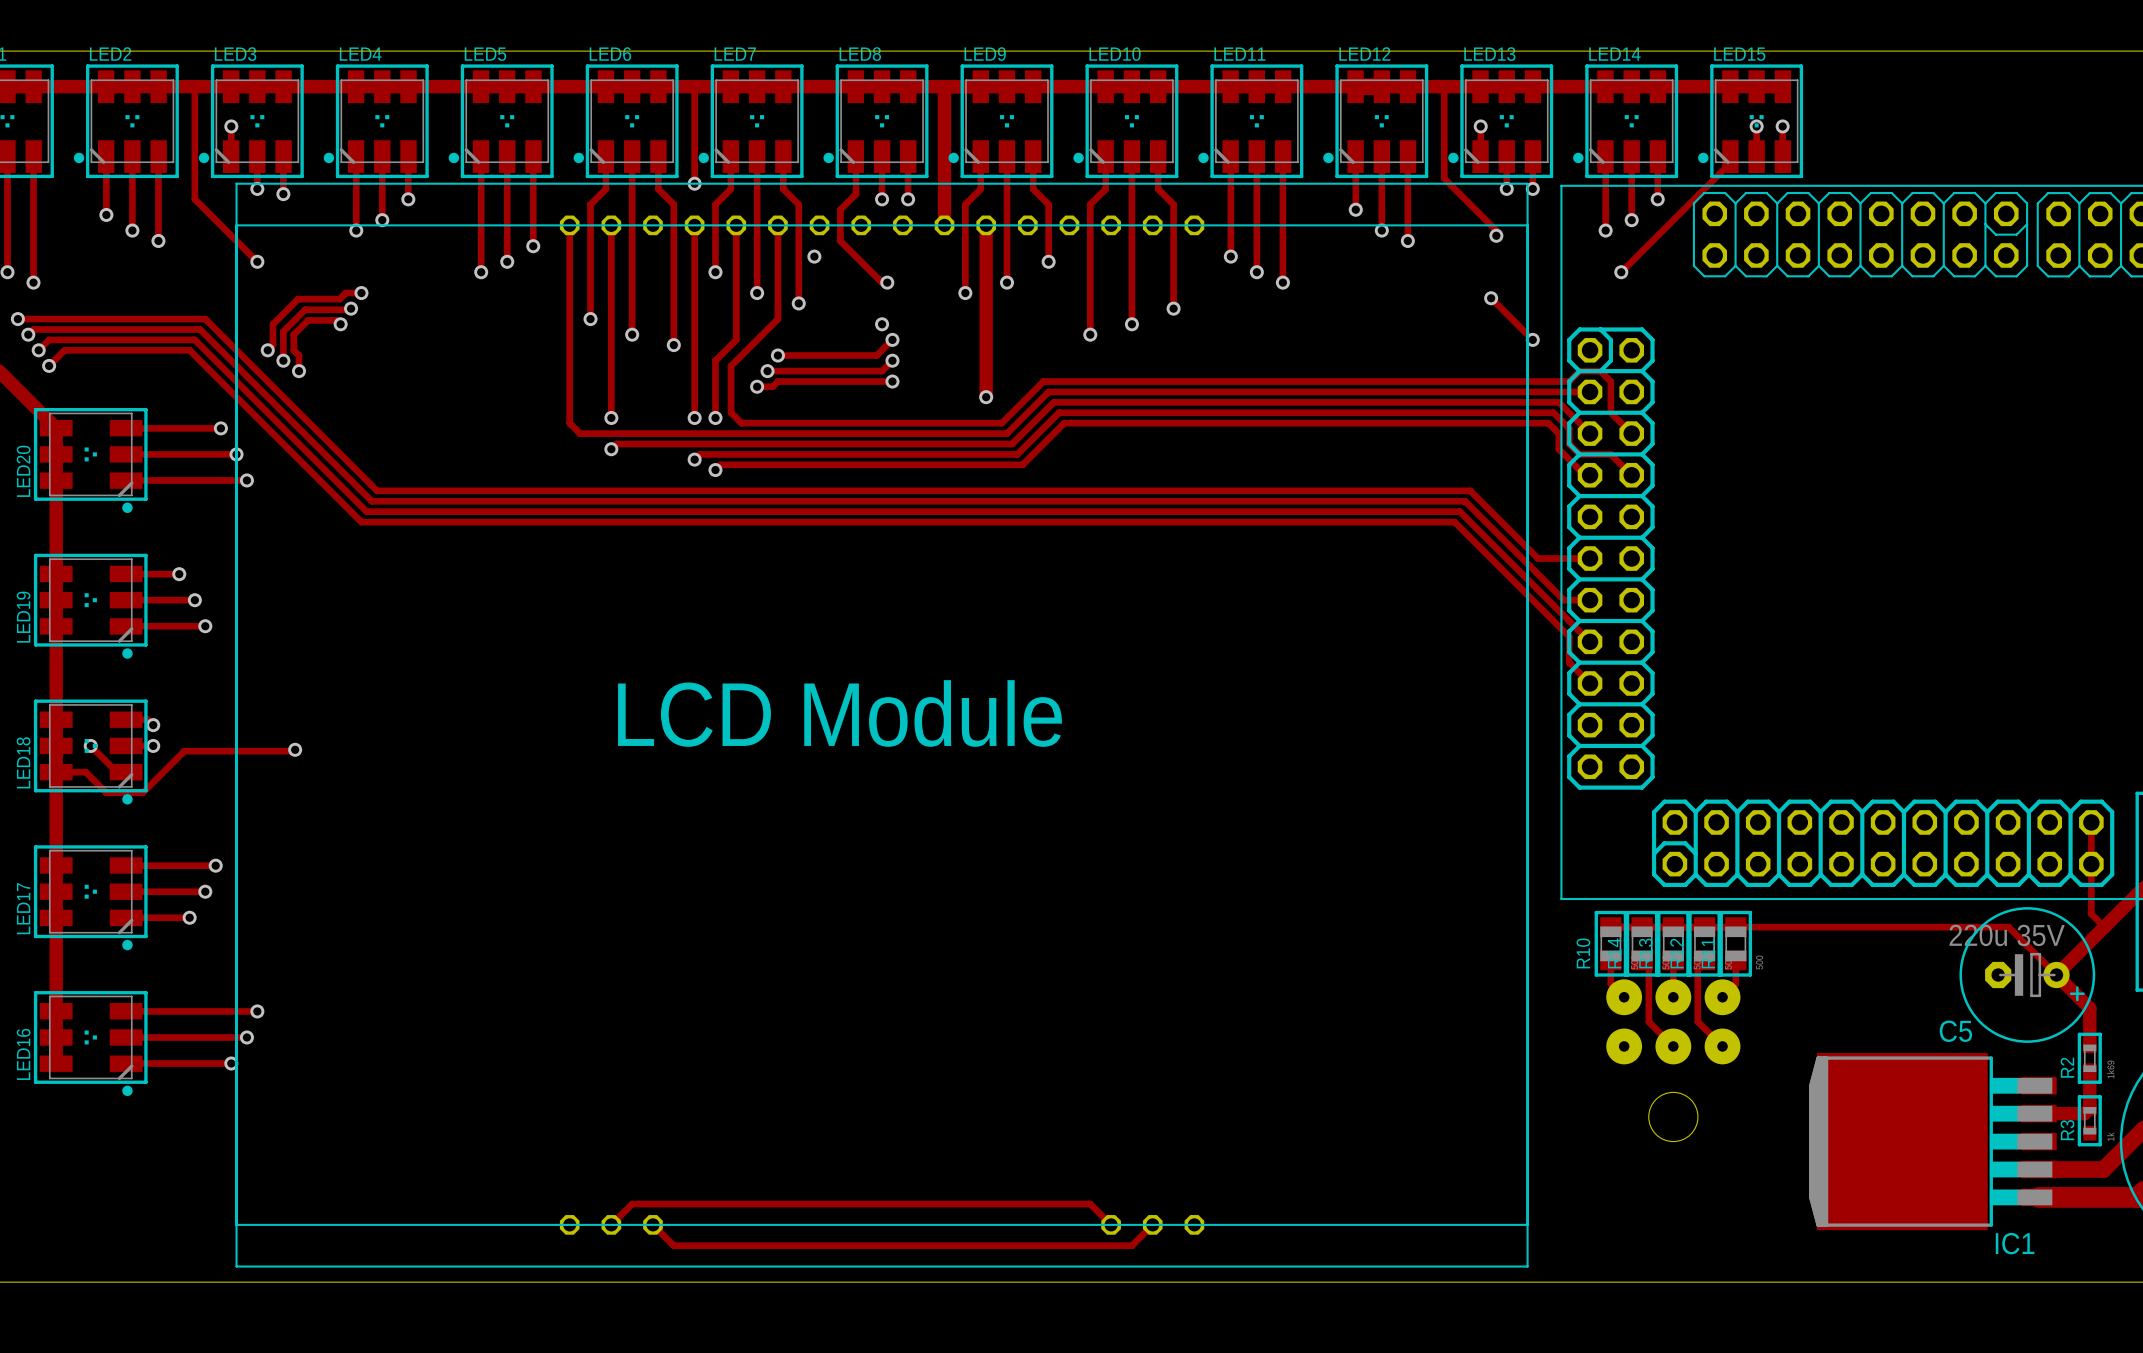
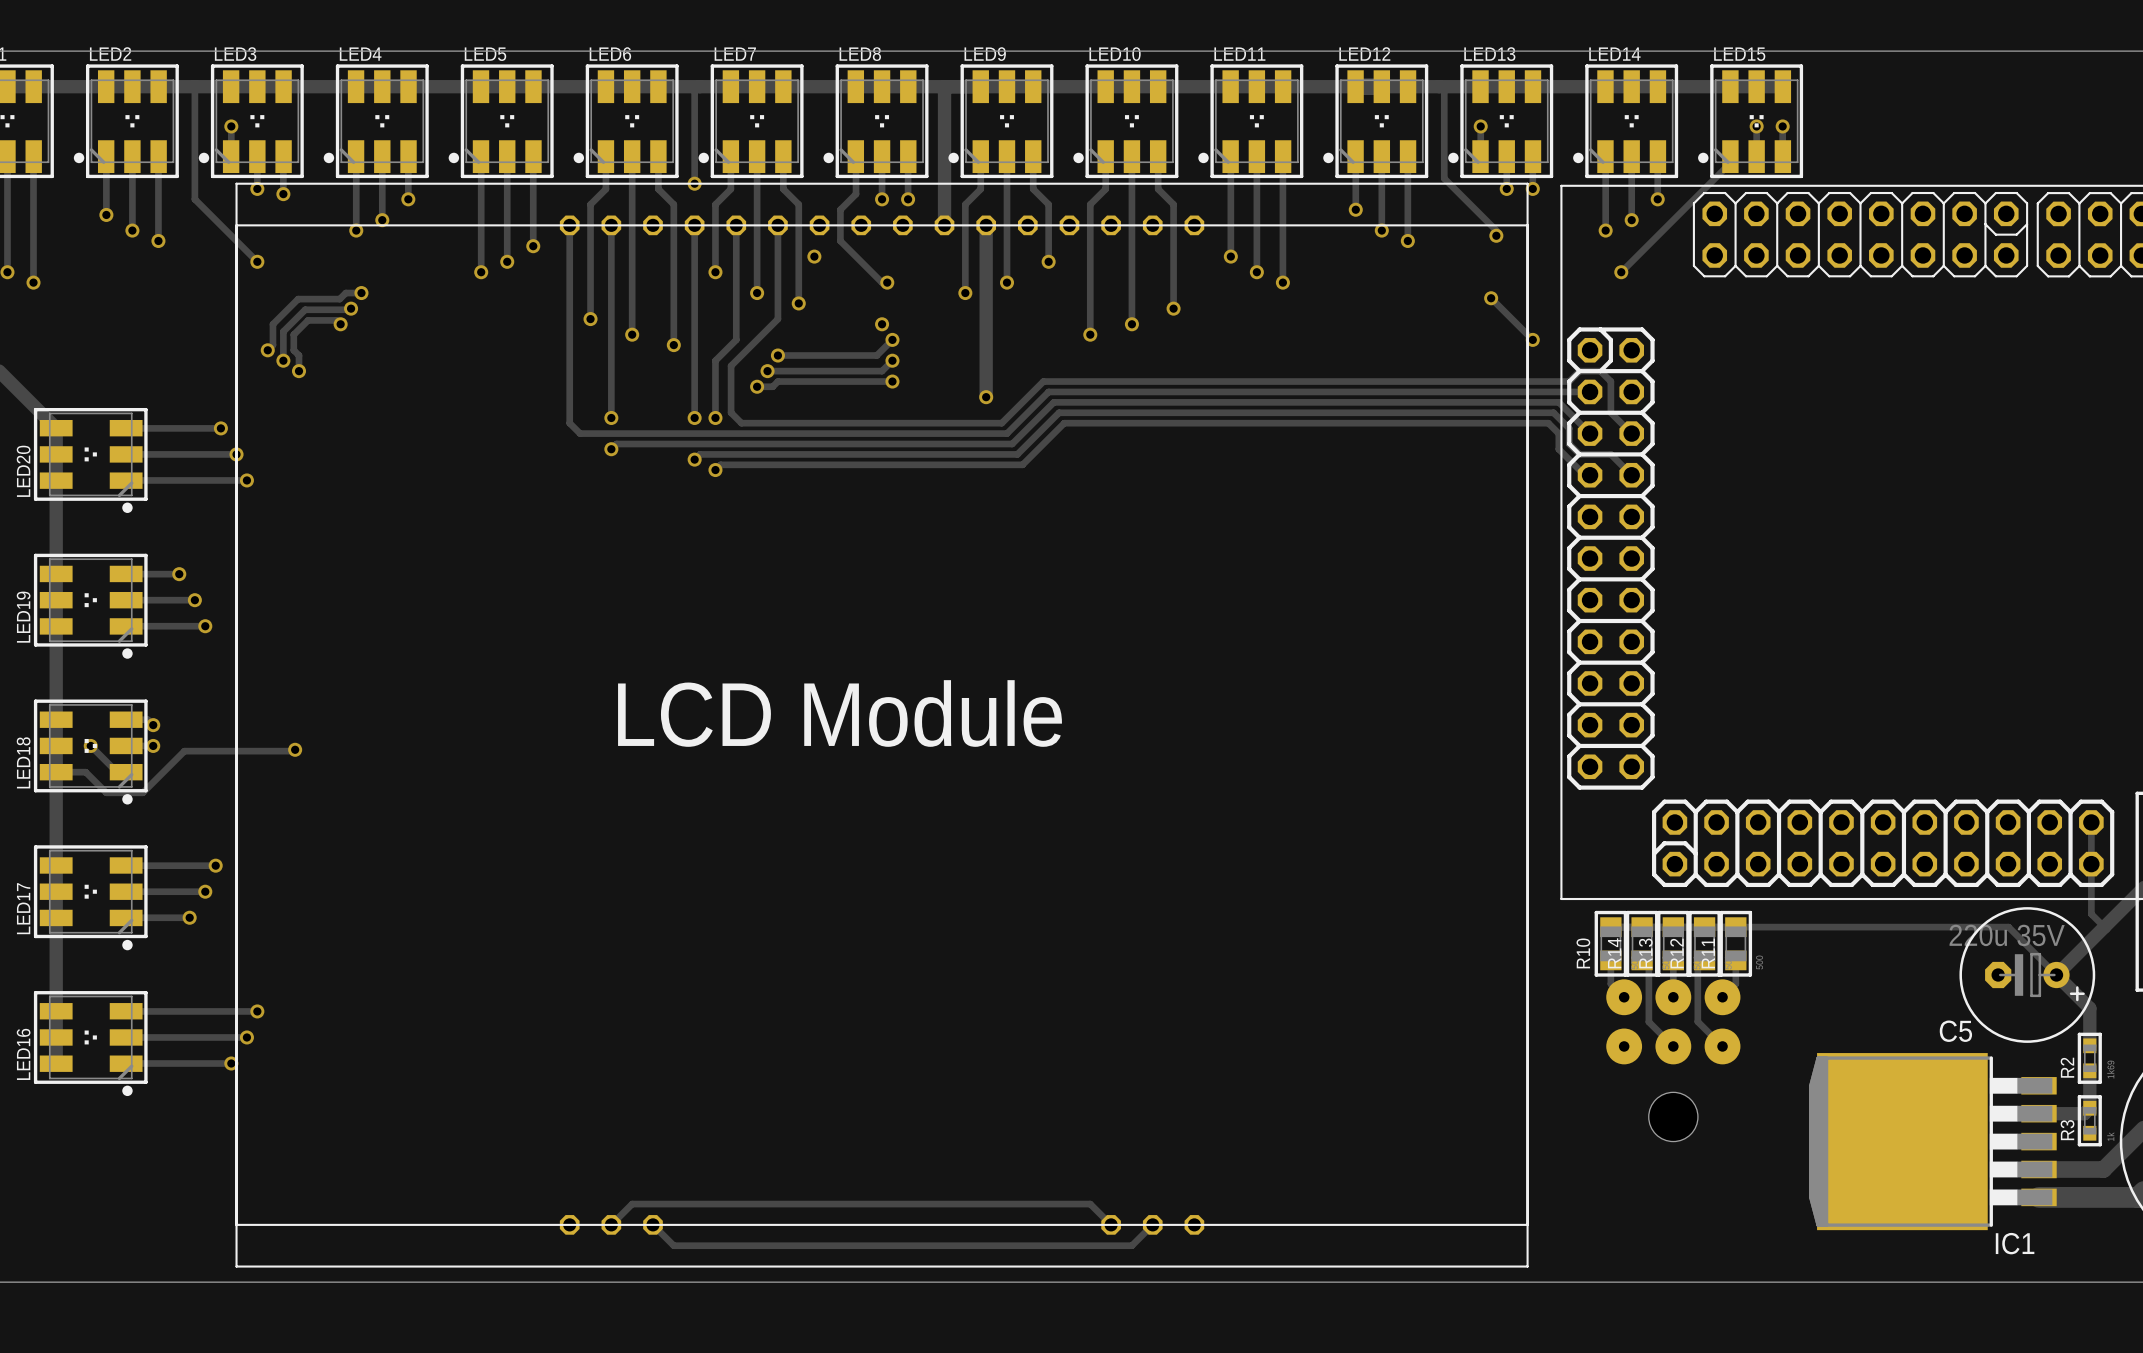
track: (17, 319) (205, 319) (377, 490) (1470, 490) (1537, 558) (1590, 558) -> none
via: (17, 319) -> none
track: (28, 334) (33, 329) (200, 329) (371, 501) (1465, 501) (1564, 600) (1590, 600) -> none
via: (28, 334) -> none
track: (38, 350) (49, 339) (194, 339) (366, 511) (1459, 511) (1590, 641) -> none
via: (38, 350) -> none
track: (49, 365) (64, 350) (189, 350) (361, 522) (1454, 522) (1569, 636) (1569, 662) (1590, 683) -> none
via: (49, 365) -> none

